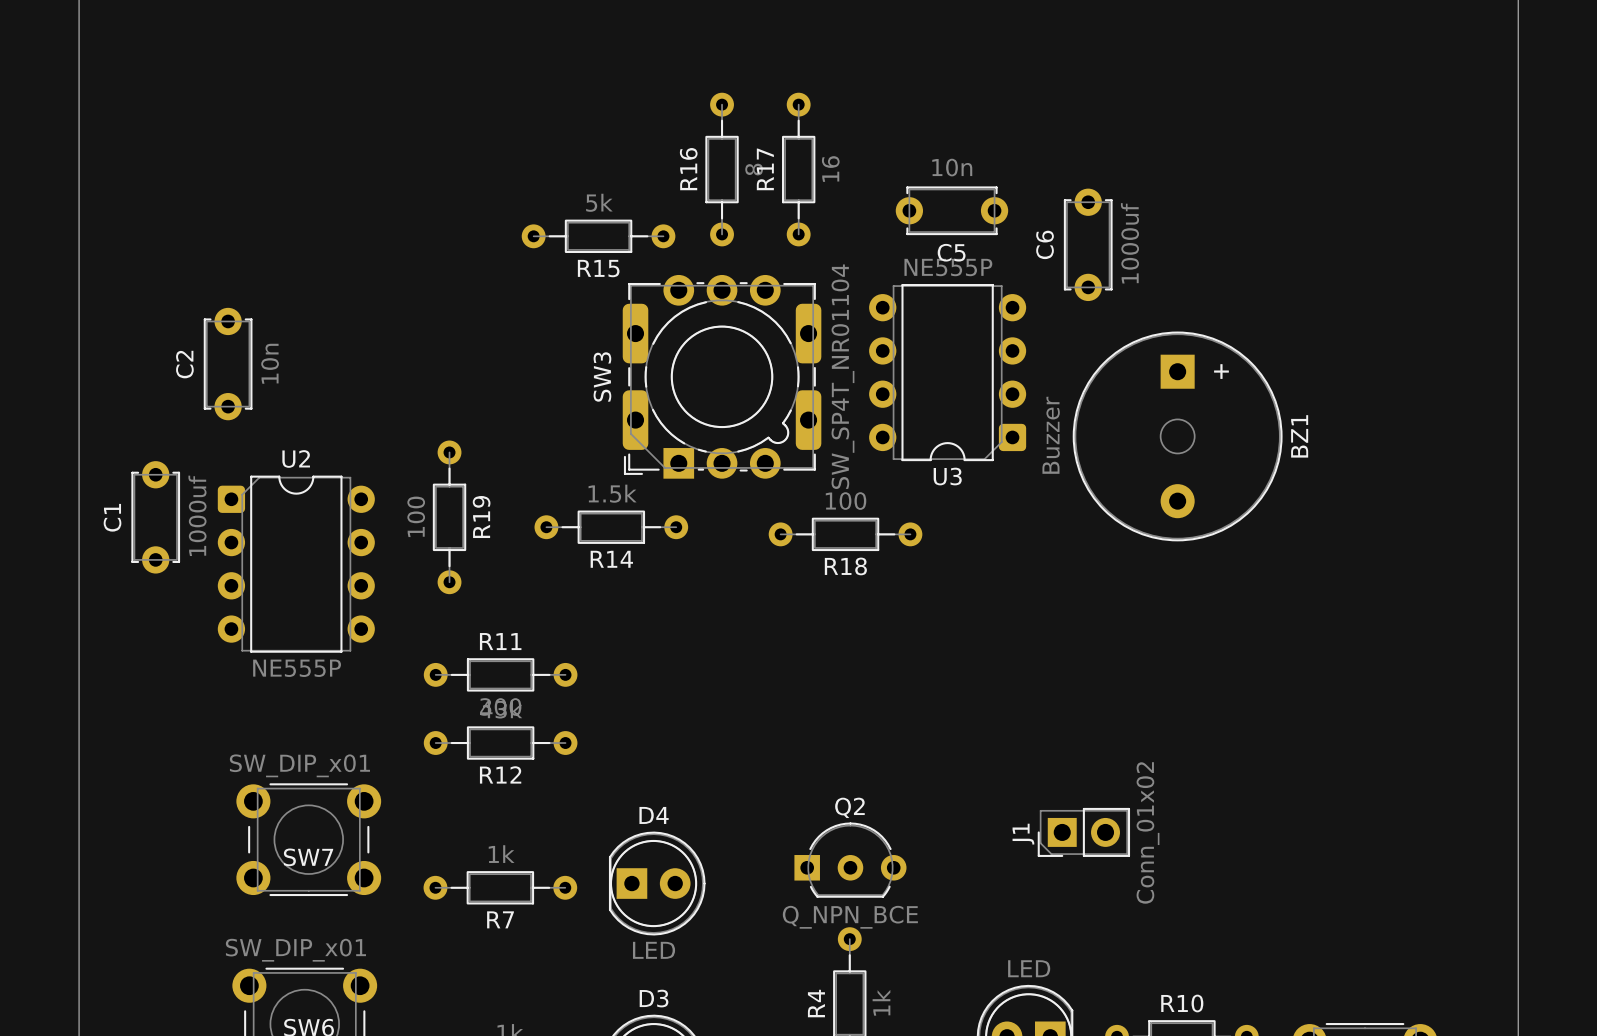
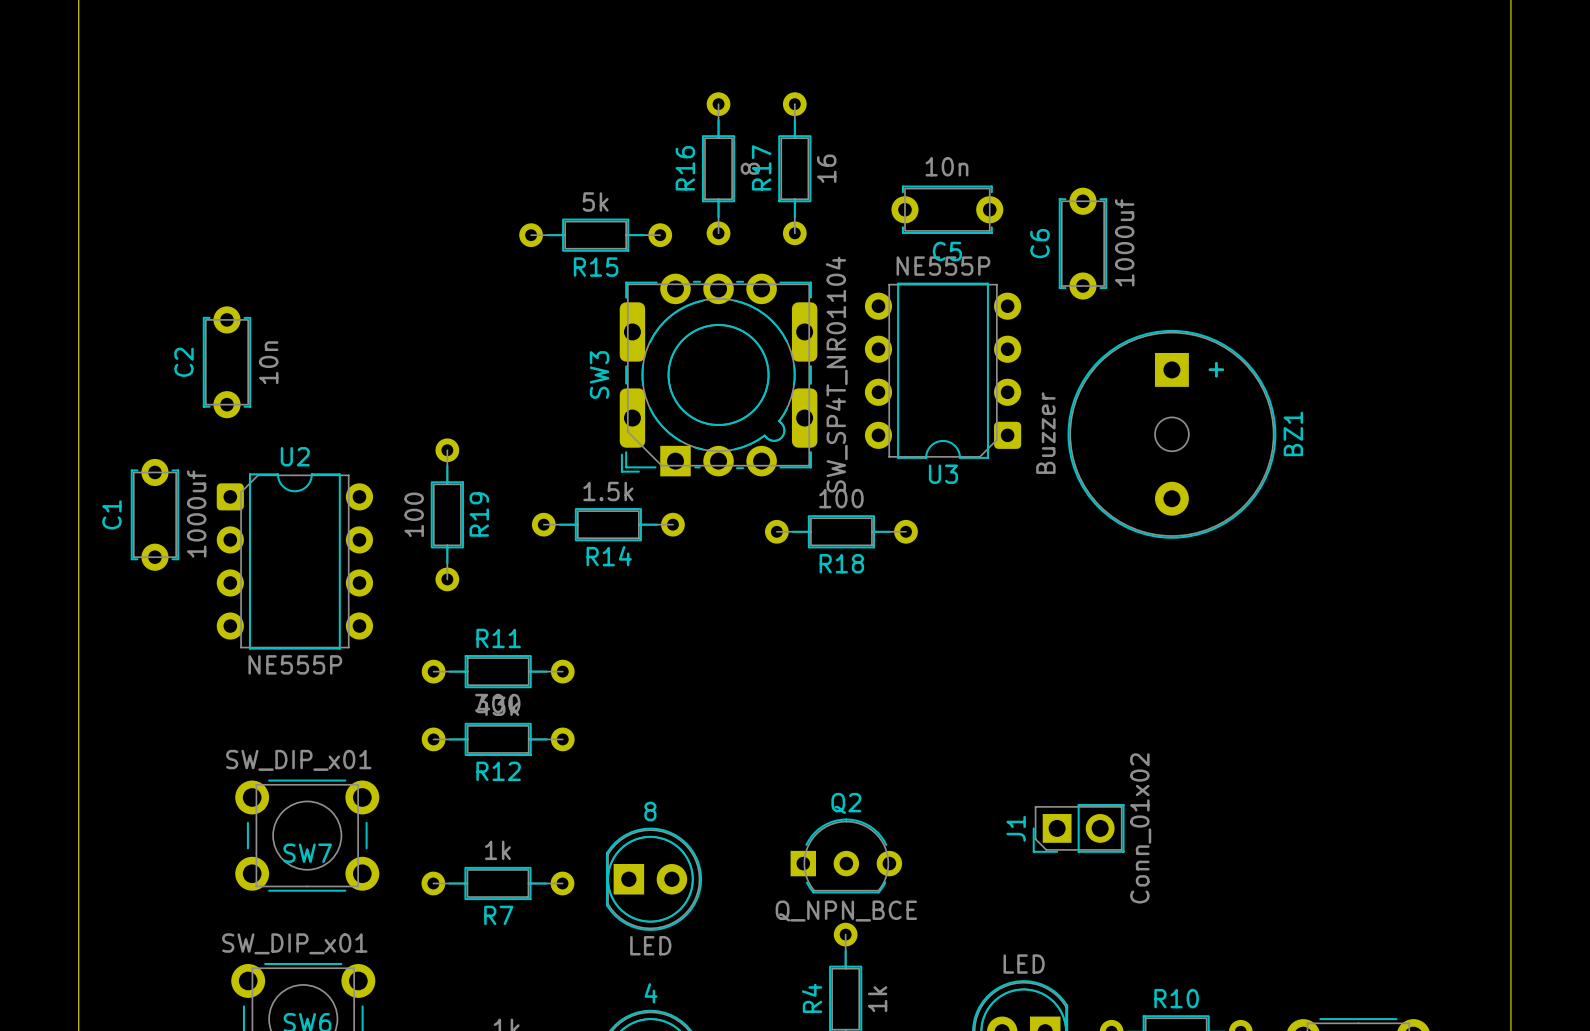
D4 name: D4 (654, 815) -> 8 (650, 811)
D3 name: D3 (654, 998) -> 4 (651, 993)

